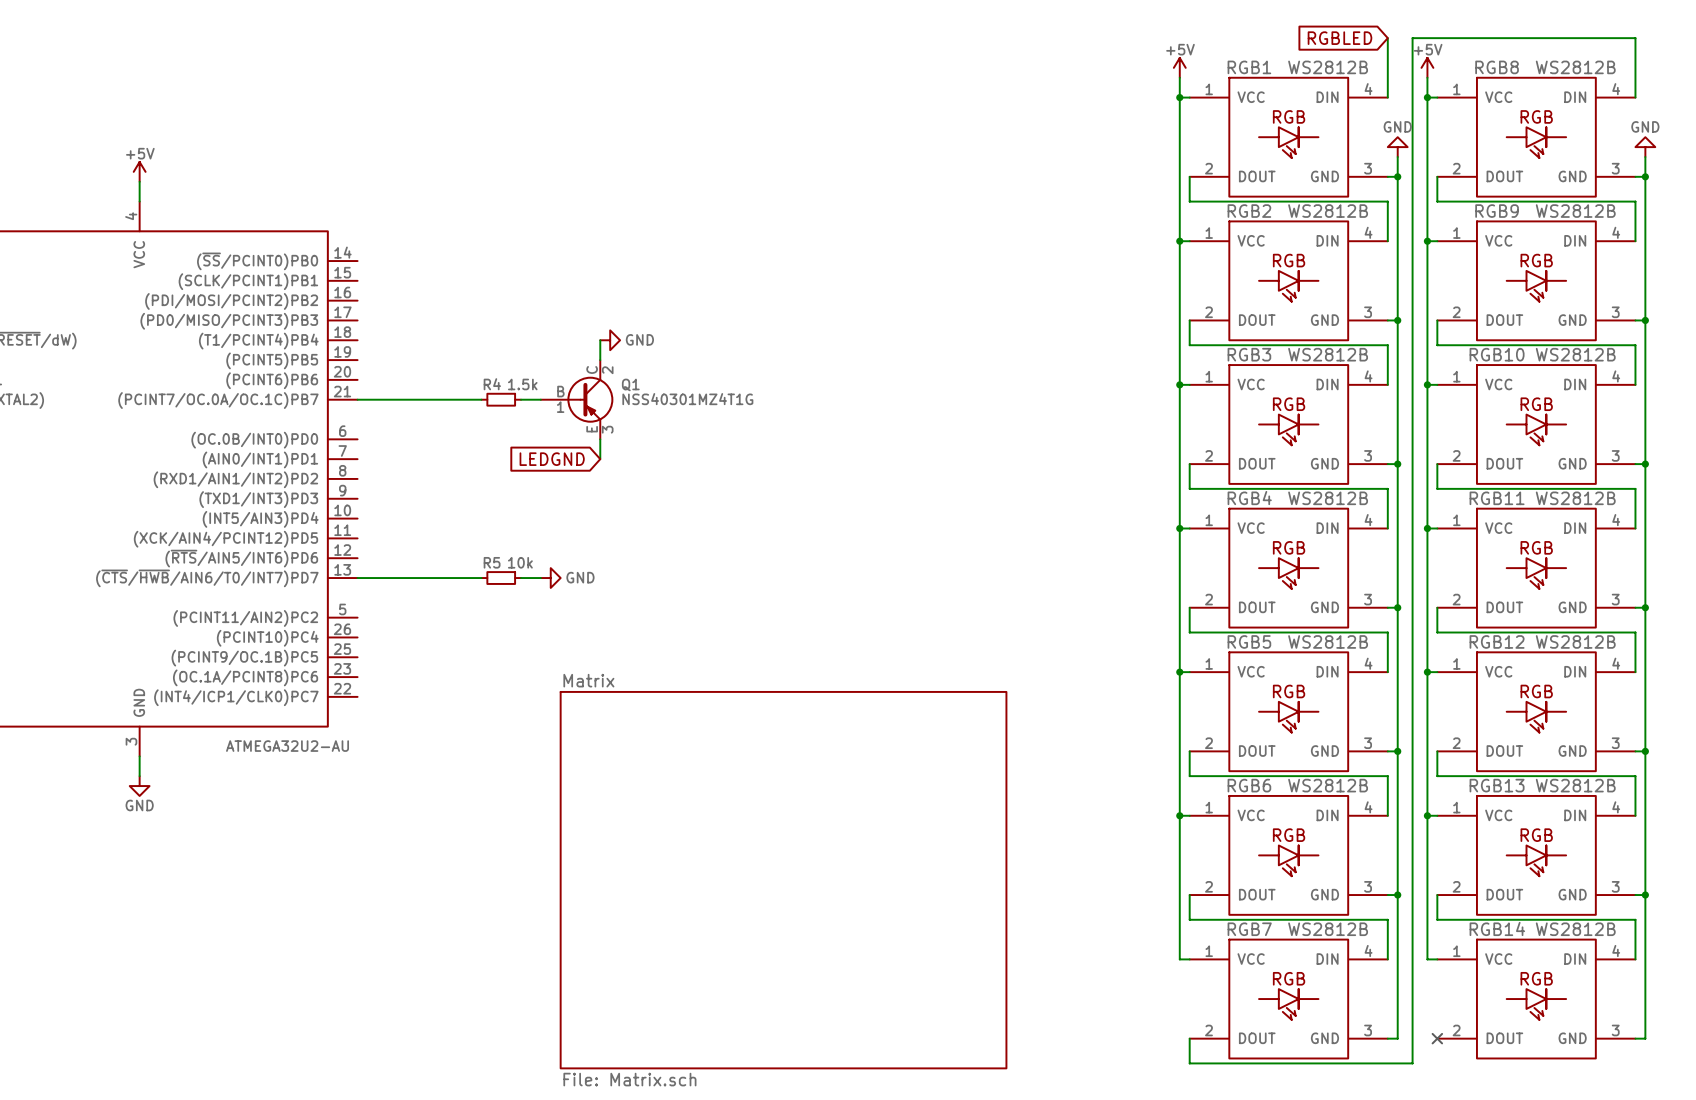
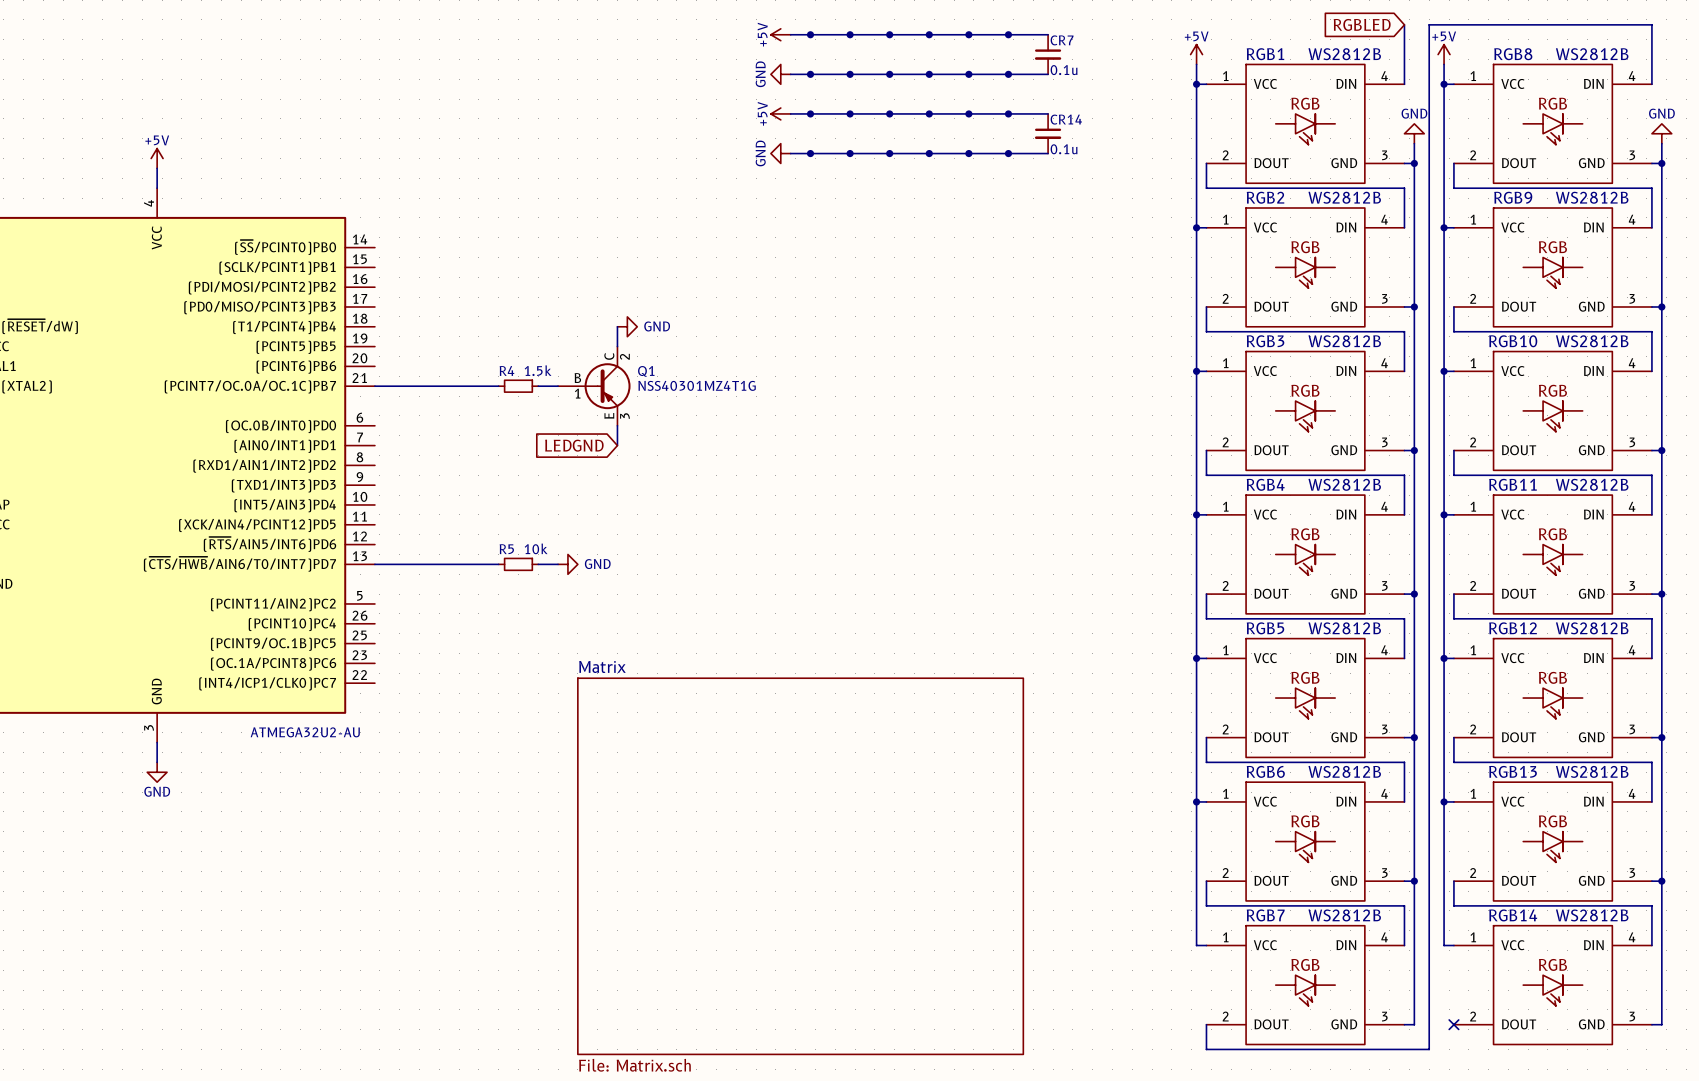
power symbol: none -> +5V (780, 34)
wire: none -> (790, 34) (1048, 34)
junction: none -> (810, 34)
junction: none -> (850, 34)
junction: none -> (889, 34)
junction: none -> (929, 34)
junction: none -> (968, 34)
junction: none -> (1008, 34)
CR7: none -> 0.1u (1048, 54)
power symbol: none -> GND (780, 74)
wire: none -> (790, 74) (1048, 74)
junction: none -> (810, 74)
junction: none -> (850, 74)
junction: none -> (889, 74)
junction: none -> (929, 74)
junction: none -> (968, 74)
junction: none -> (1008, 74)
power symbol: none -> +5V (780, 113)
wire: none -> (790, 113) (1048, 113)
junction: none -> (810, 113)
junction: none -> (850, 113)
junction: none -> (889, 113)
junction: none -> (929, 113)
junction: none -> (968, 113)
junction: none -> (1008, 113)
CR14: none -> 0.1u (1048, 133)
power symbol: none -> GND (780, 153)
wire: none -> (790, 153) (1048, 153)
junction: none -> (810, 153)
junction: none -> (850, 153)
junction: none -> (889, 153)
junction: none -> (929, 153)
junction: none -> (968, 153)
junction: none -> (1008, 153)

